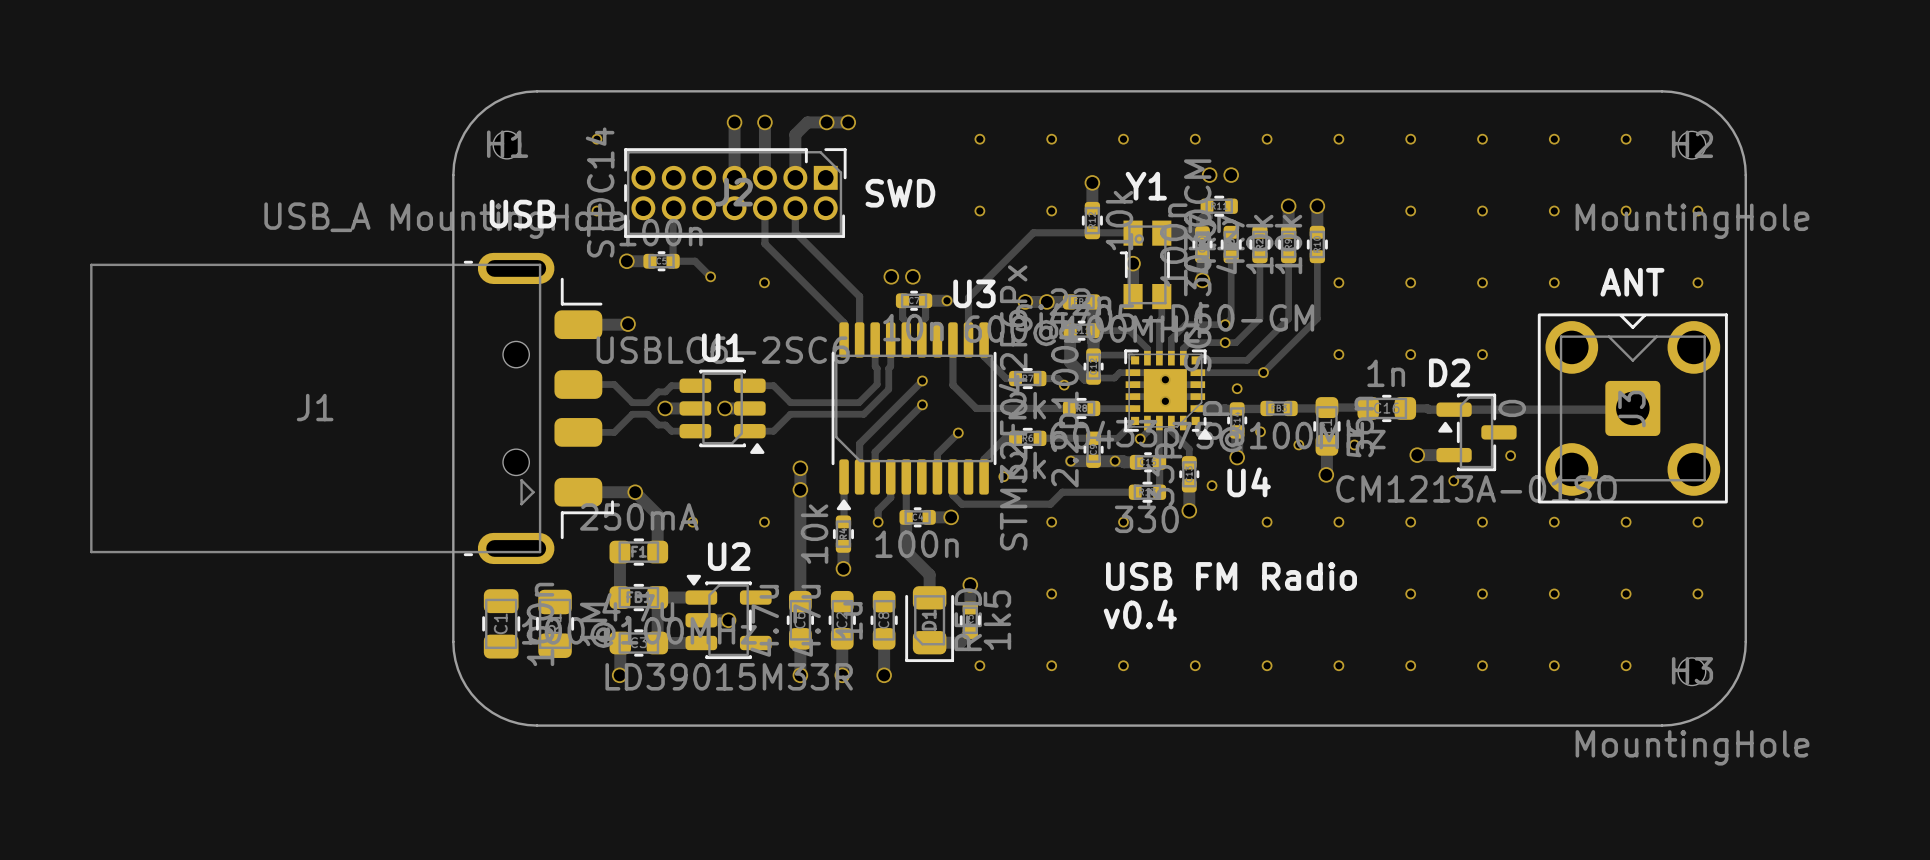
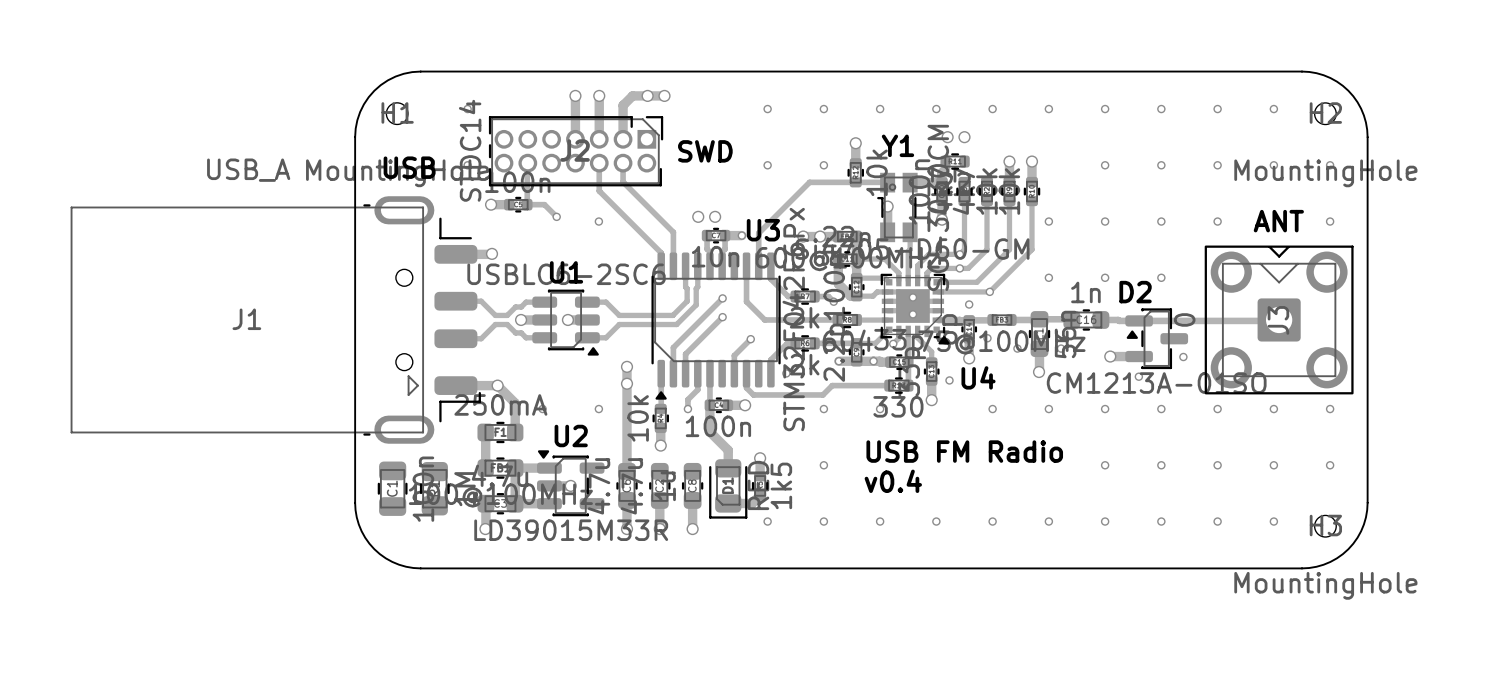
J1 footprint: [90, 252, 614, 565] -> [70, 196, 481, 444]

